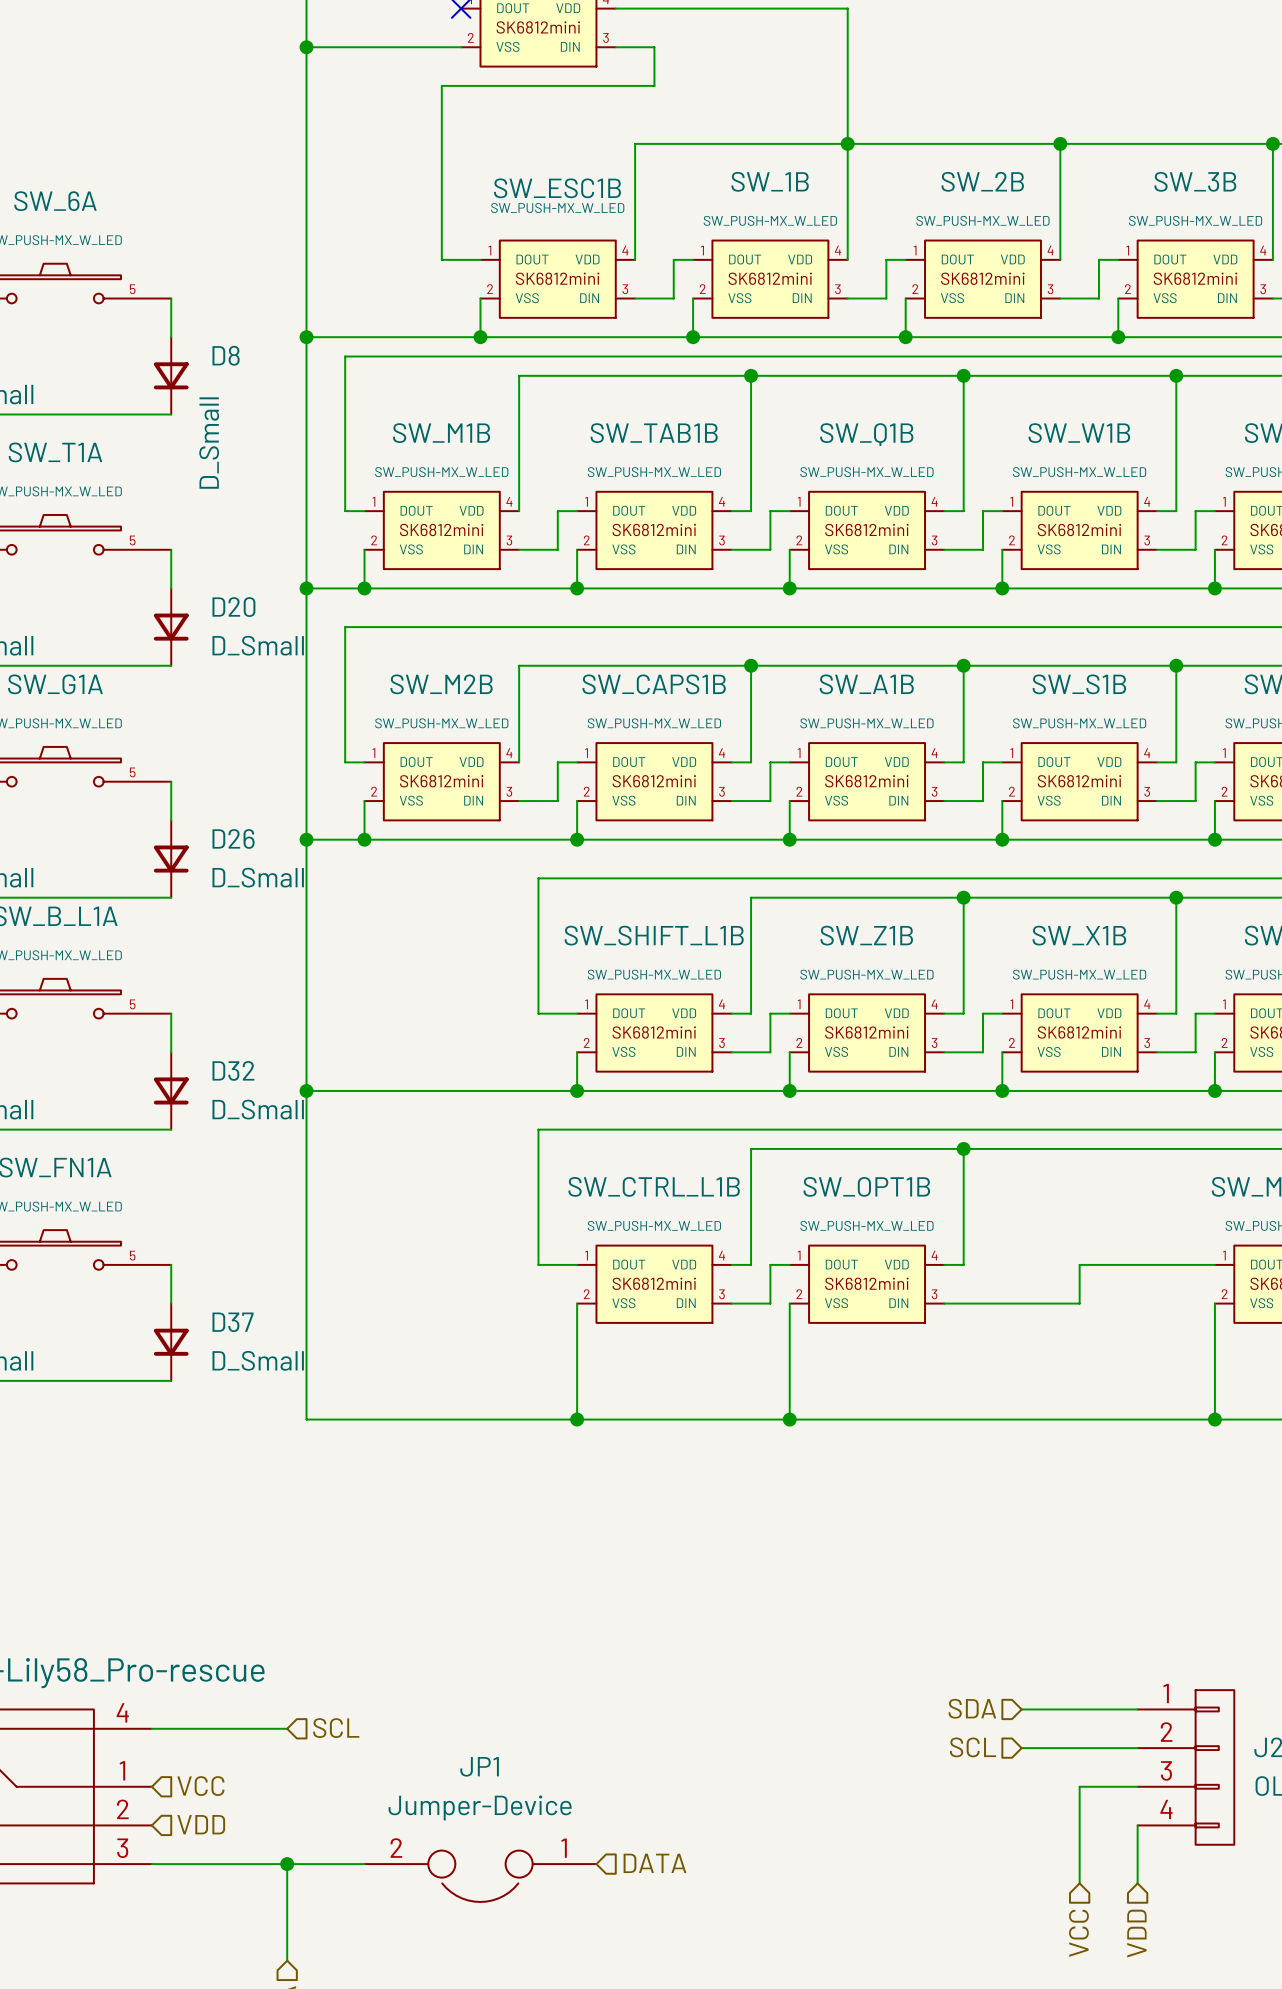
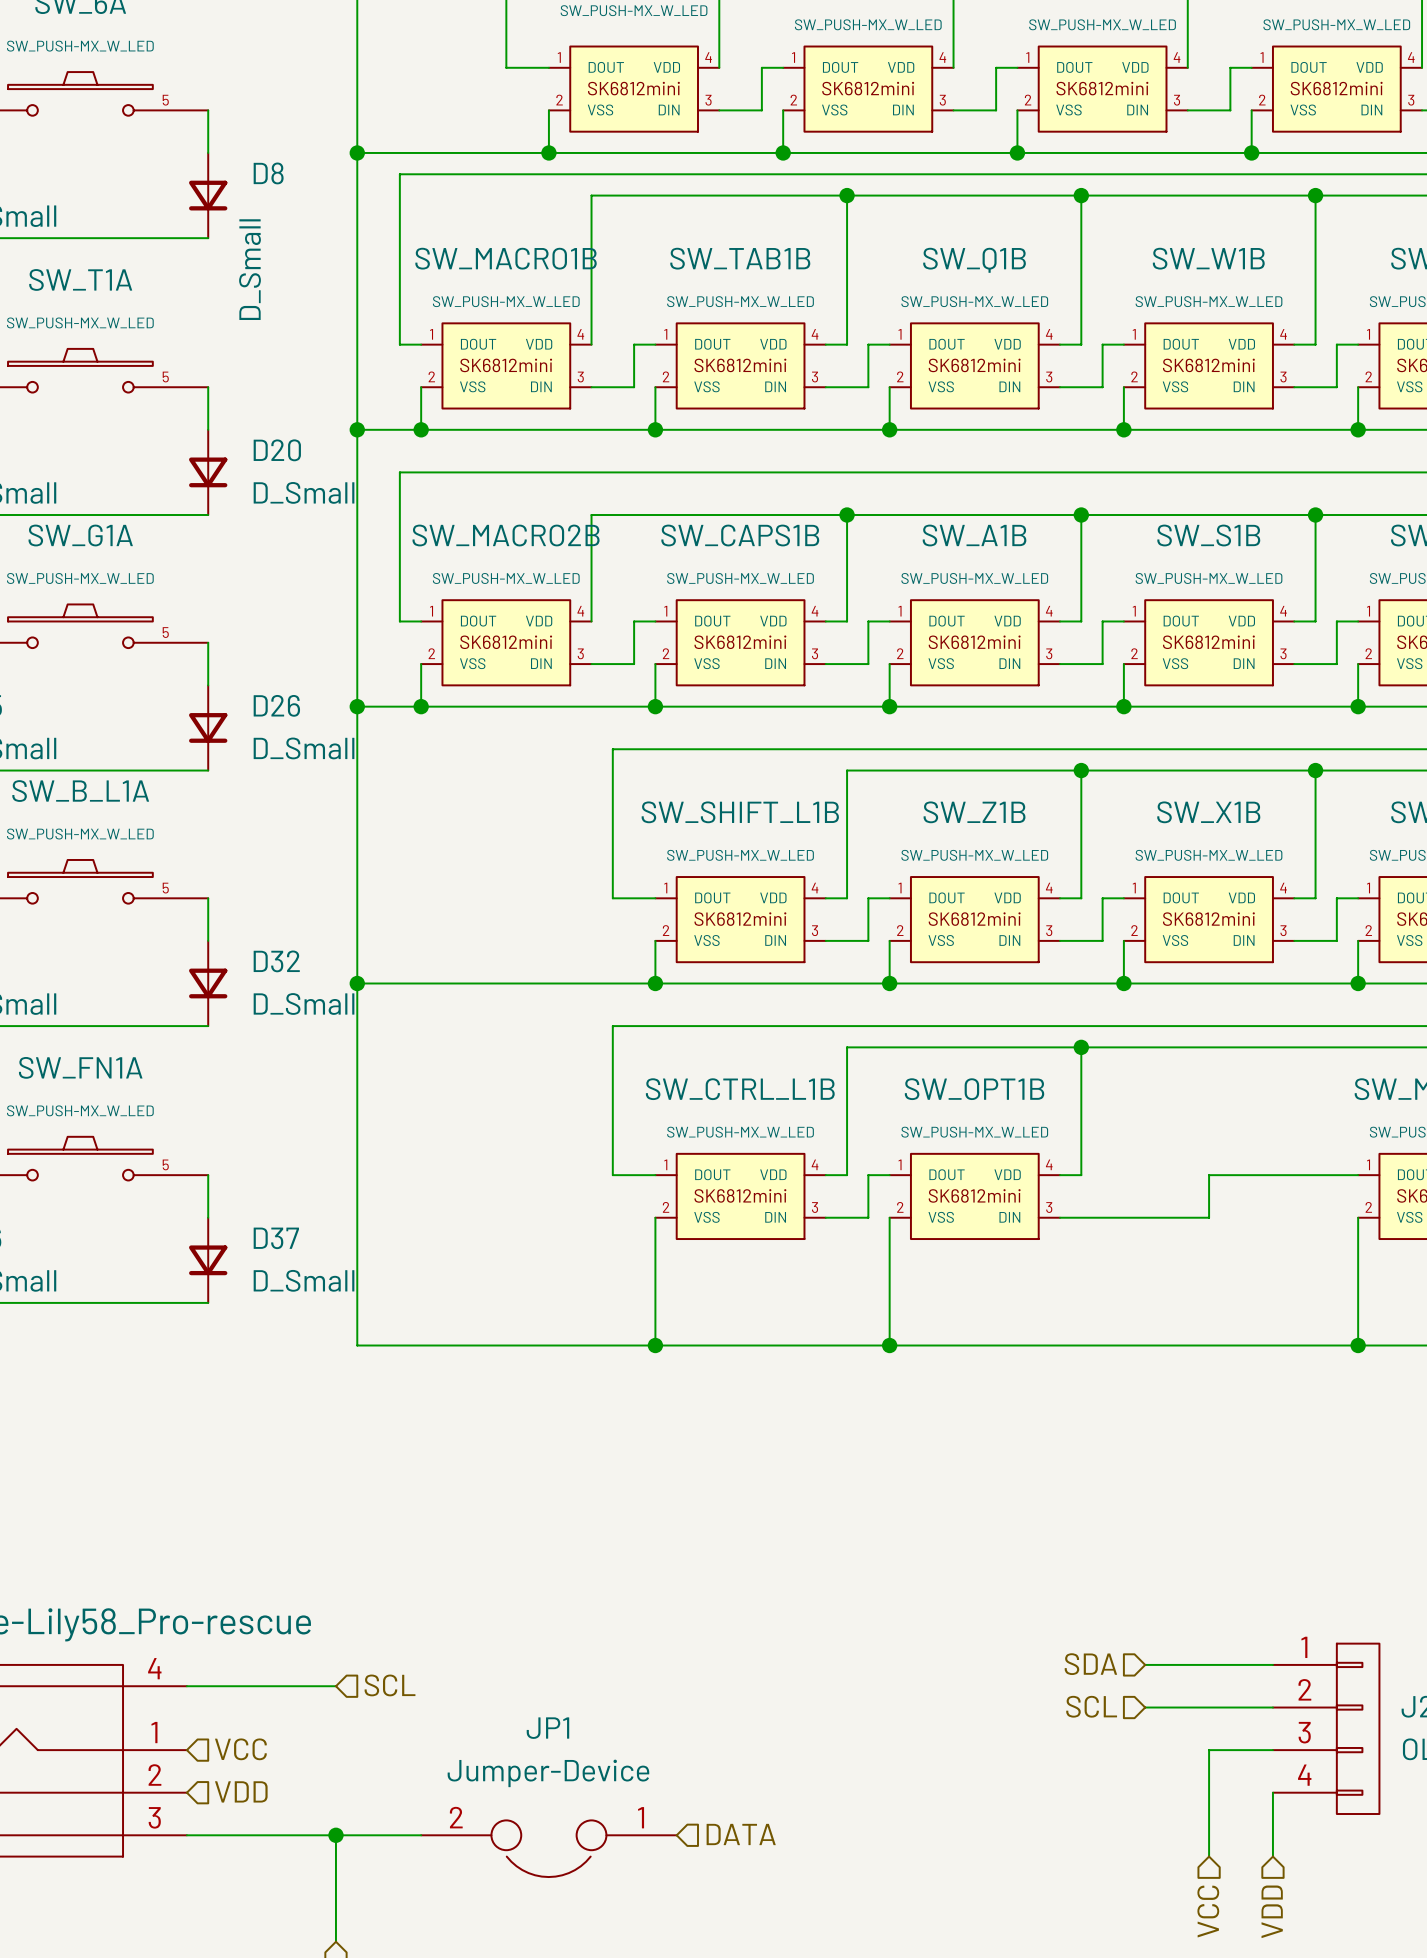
SW_M1B name: SW_M1B (441, 433) -> SW_MACRO1B (506, 258)
SW_M2B name: SW_M2B (441, 684) -> SW_MACRO2B (506, 535)

